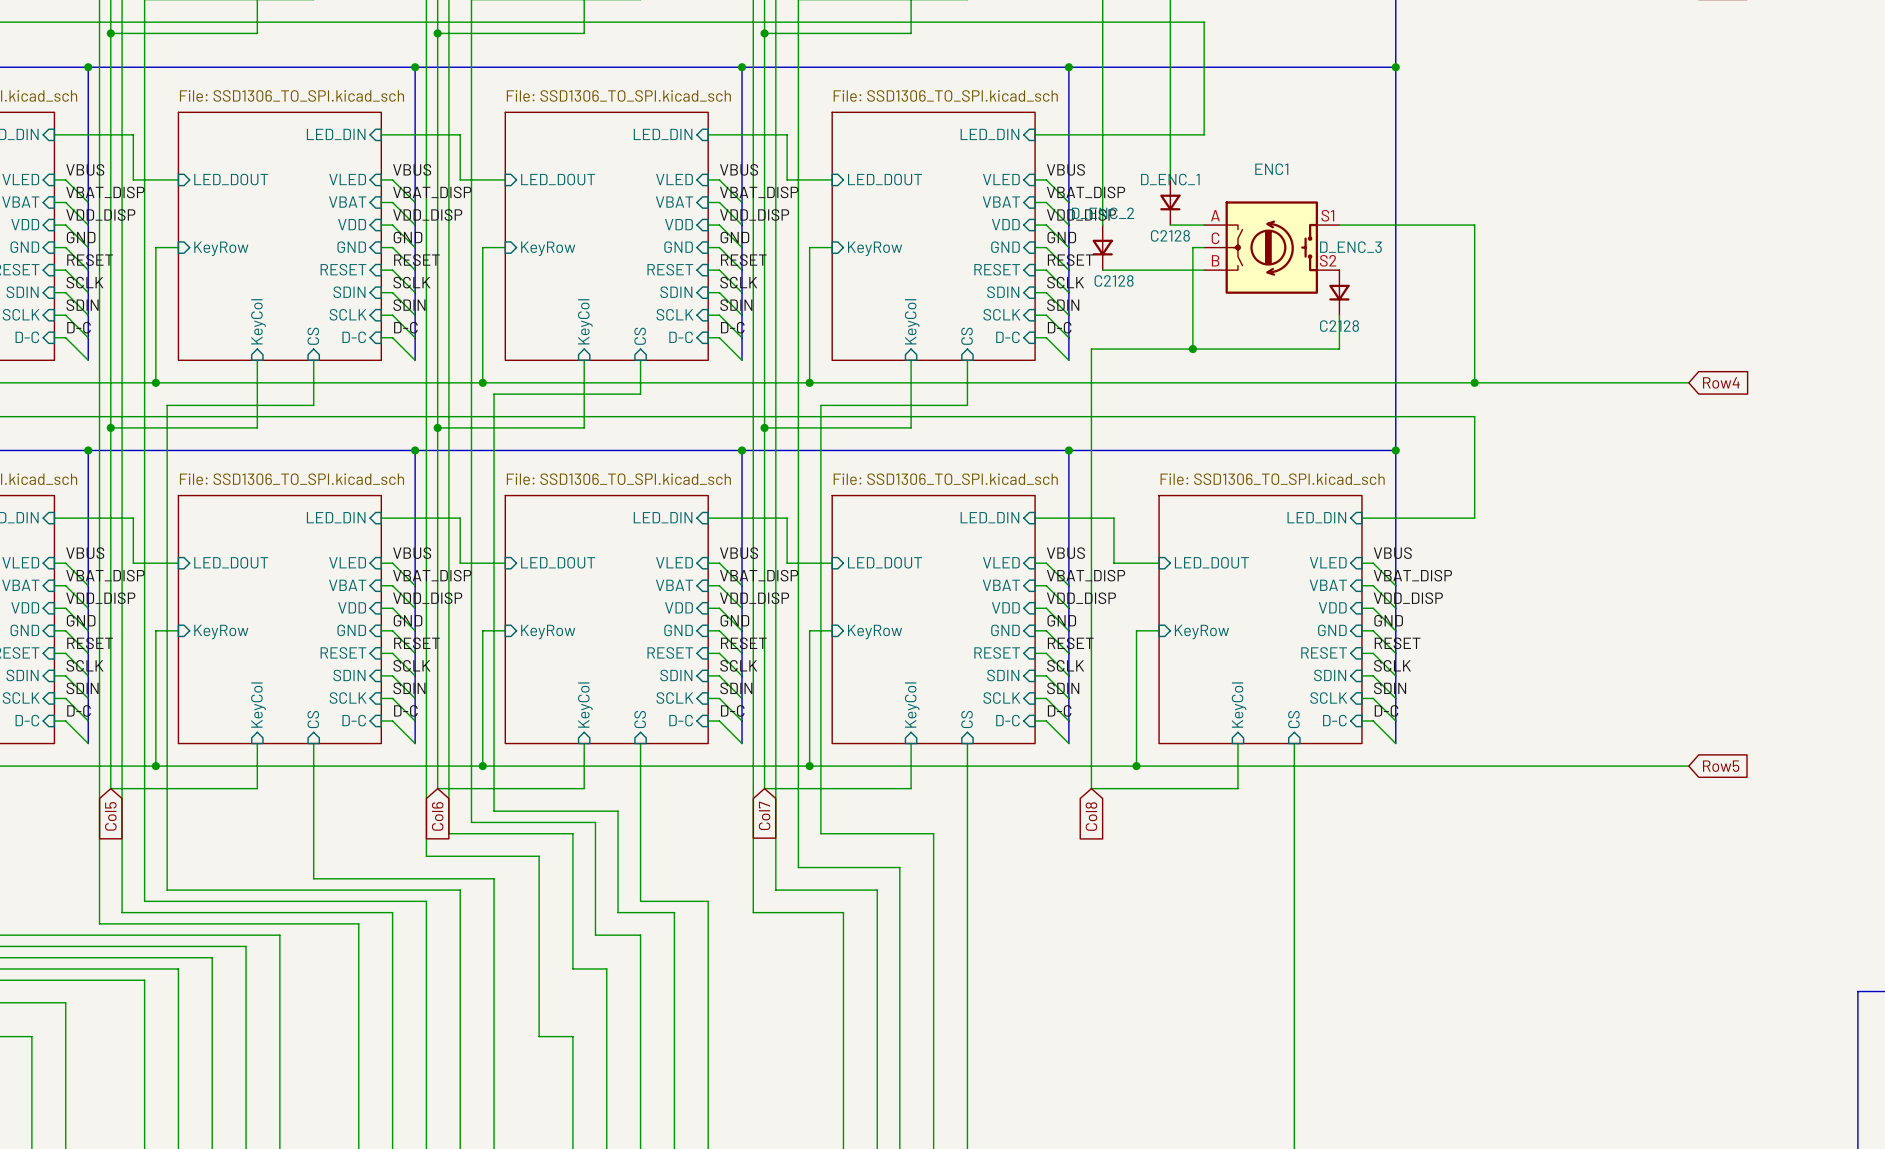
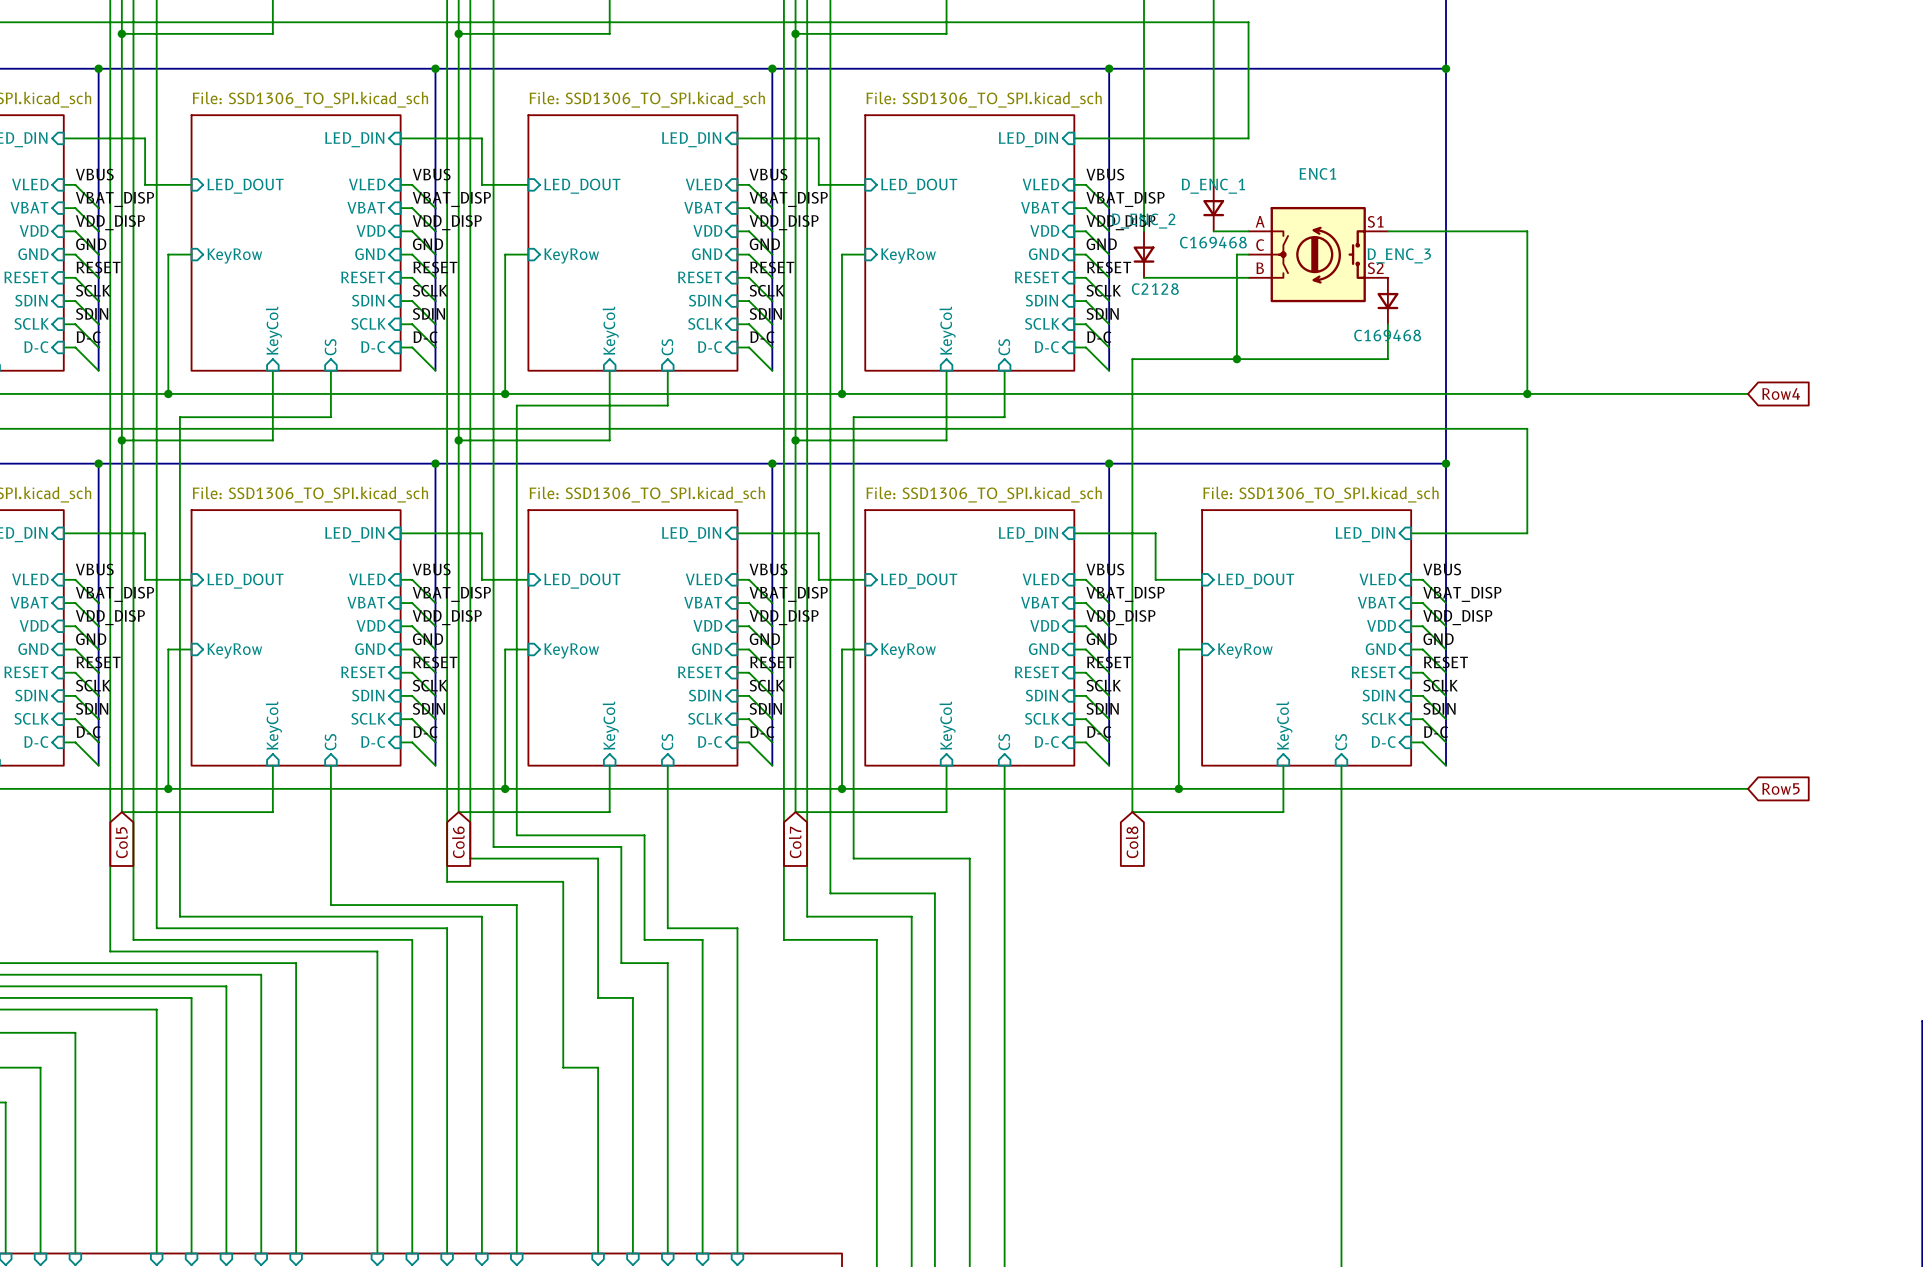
D_ENC_1 text: C2128 (1170, 235) -> C169468 (1213, 242)
D_ENC_3 text: C2128 (1339, 326) -> C169468 (1387, 335)

